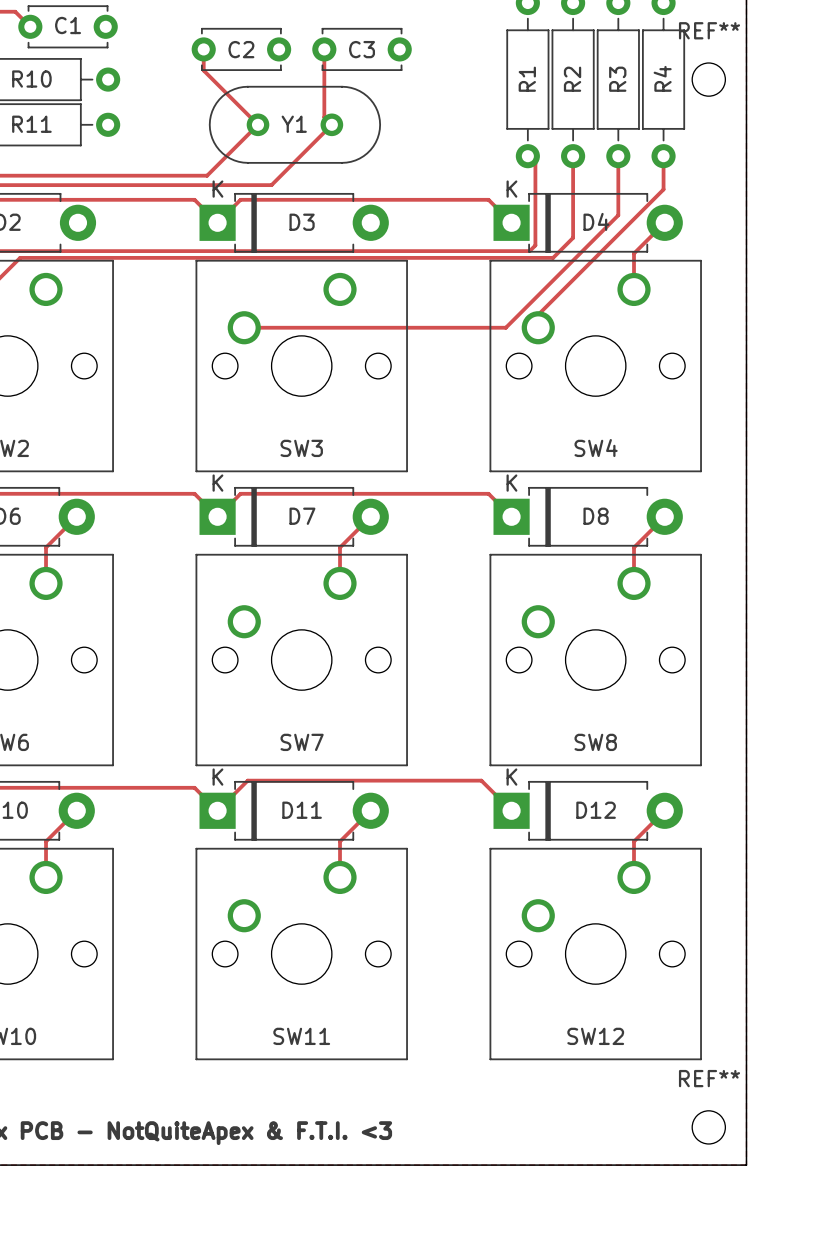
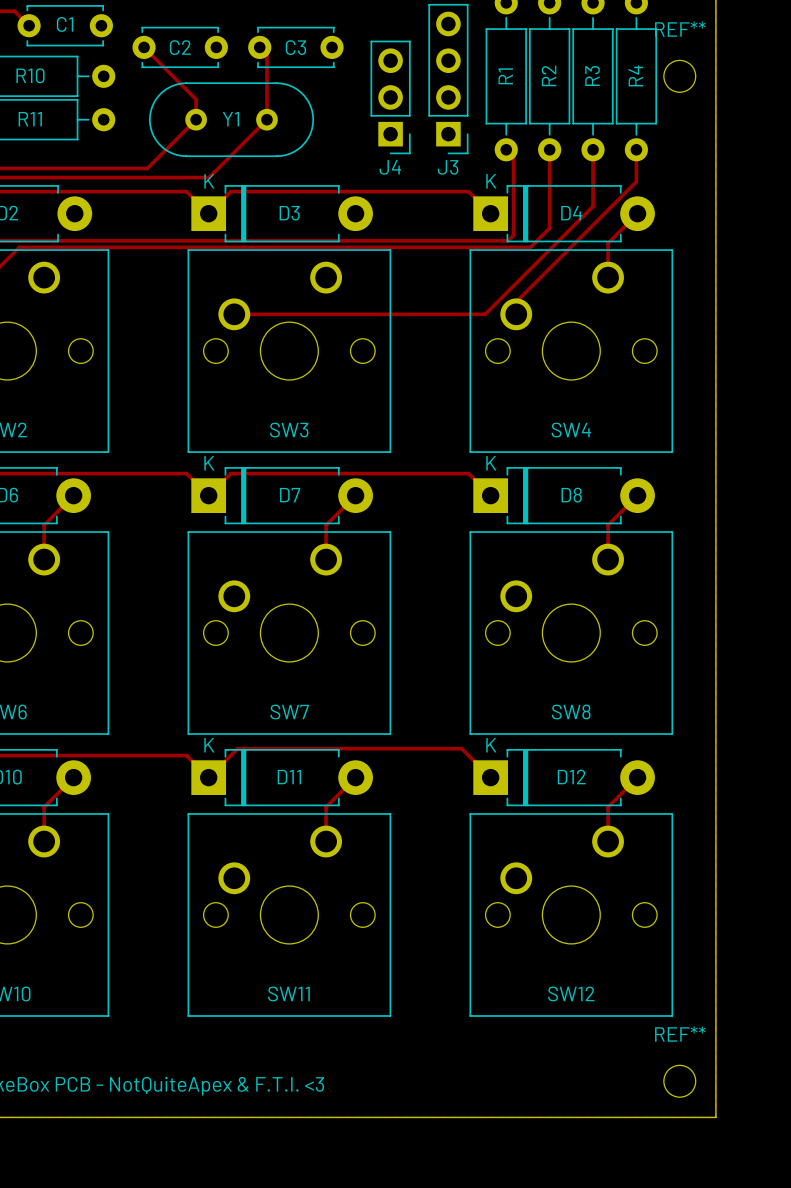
track: (203, 49) (203, 70) (258, 124) (207, 175) (153, 175) -> (144, 47) (196, 99) (196, 119) (147, 168)
C2 position: (241, 49) -> (180, 47)
track: (324, 49) (324, 117) (331, 124) (271, 185) (218, 185) -> (259, 47) (266, 54) (266, 119) (209, 177)
C3 position: (362, 49) -> (295, 47)
J3: none -> (448, 79)
J4: none -> (390, 97)
Y1 position: (294, 124) -> (231, 119)

